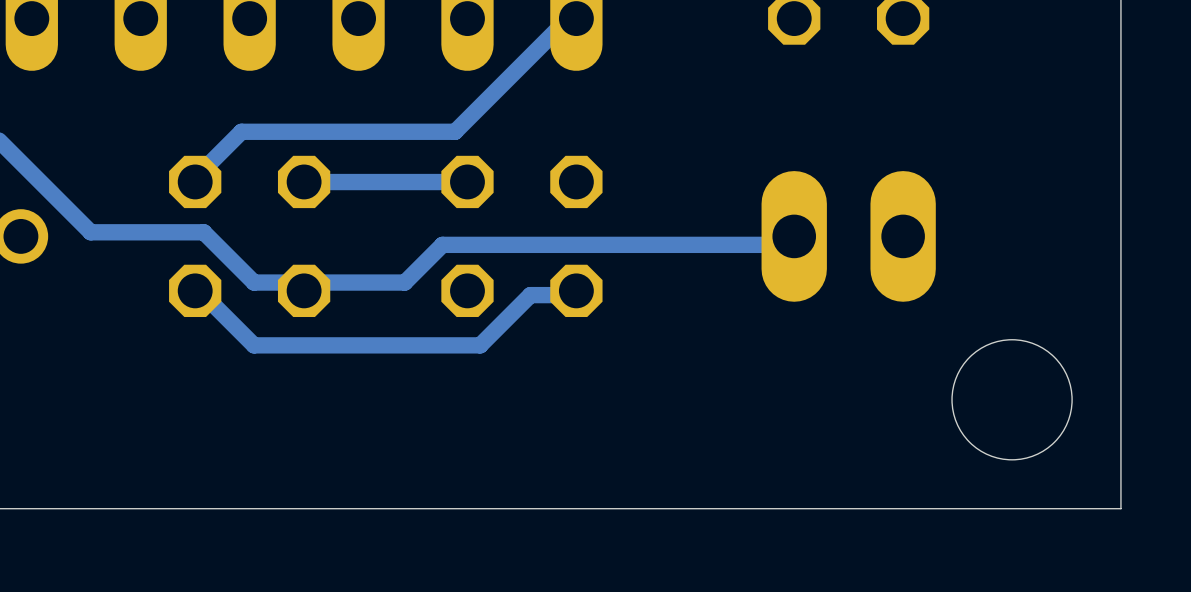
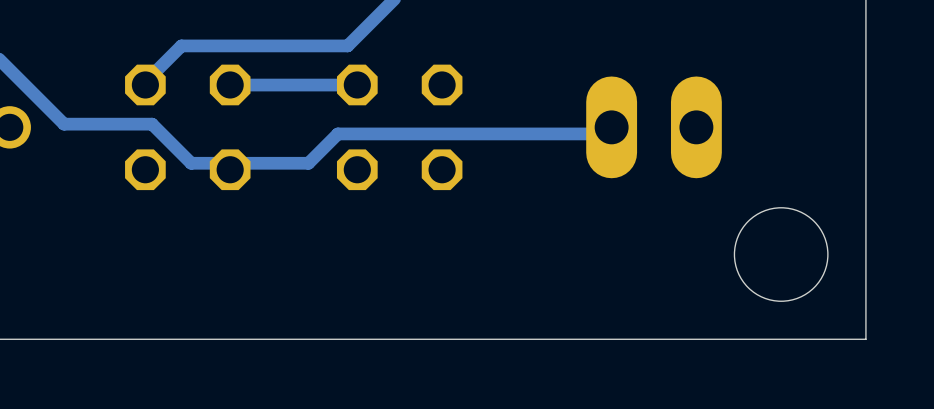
track: (576, 290) (568, 295) (530, 295) (480, 345) (254, 345) (203, 295) (195, 290) -> none

